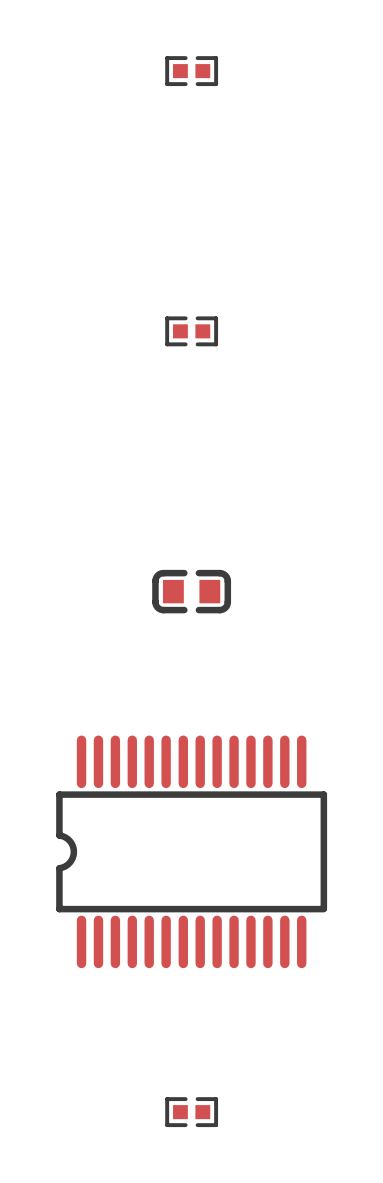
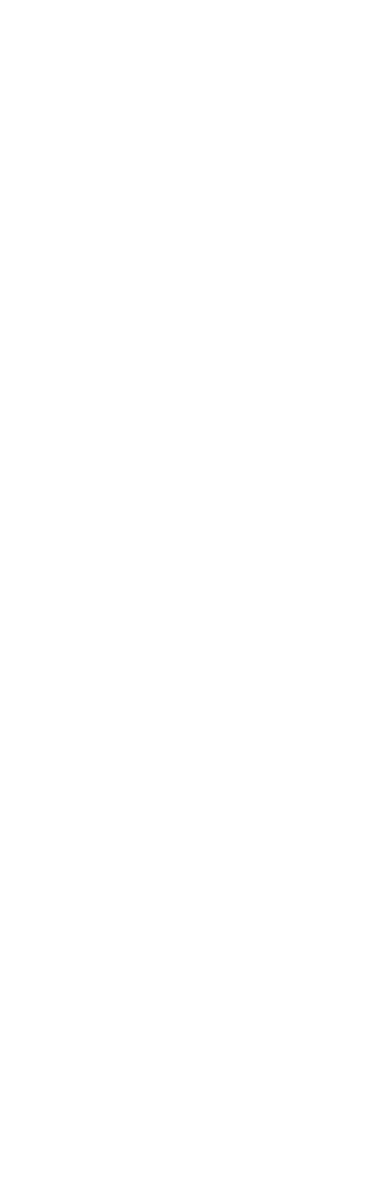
part: (191, 71) -> none
part: (191, 331) -> none
part: (191, 591) -> none
part: (191, 851) -> none
part: (191, 1112) -> none

